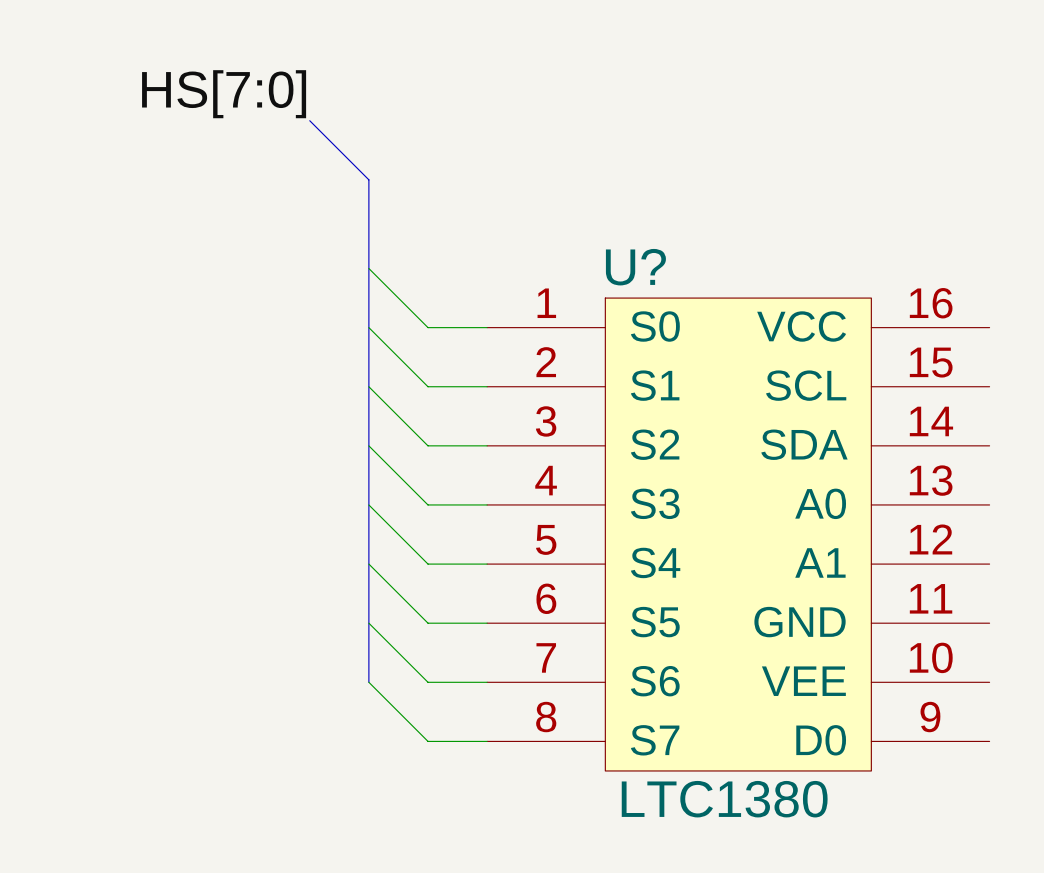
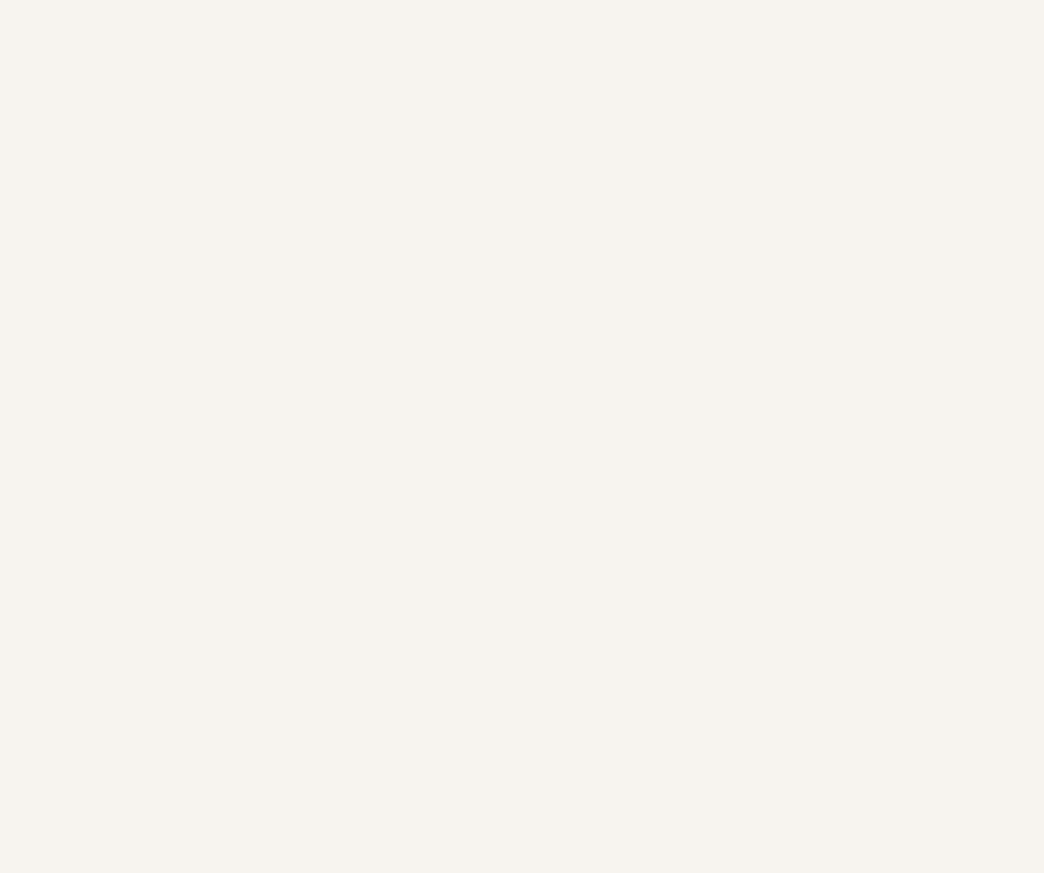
label: HS[7:0] (224, 94) -> none
bus: (309, 120) (368, 179) (368, 682) -> none
wire: (368, 268) (428, 327) (487, 327) -> none
wire: (368, 327) (428, 386) (487, 386) -> none
wire: (368, 386) (428, 445) (487, 445) -> none
wire: (368, 445) (428, 504) (487, 504) -> none
wire: (368, 504) (428, 564) (487, 564) -> none
U?: LTC1380 (738, 534) -> none
wire: (368, 564) (428, 623) (487, 623) -> none
wire: (368, 623) (428, 682) (487, 682) -> none
wire: (368, 682) (428, 741) (487, 741) -> none

